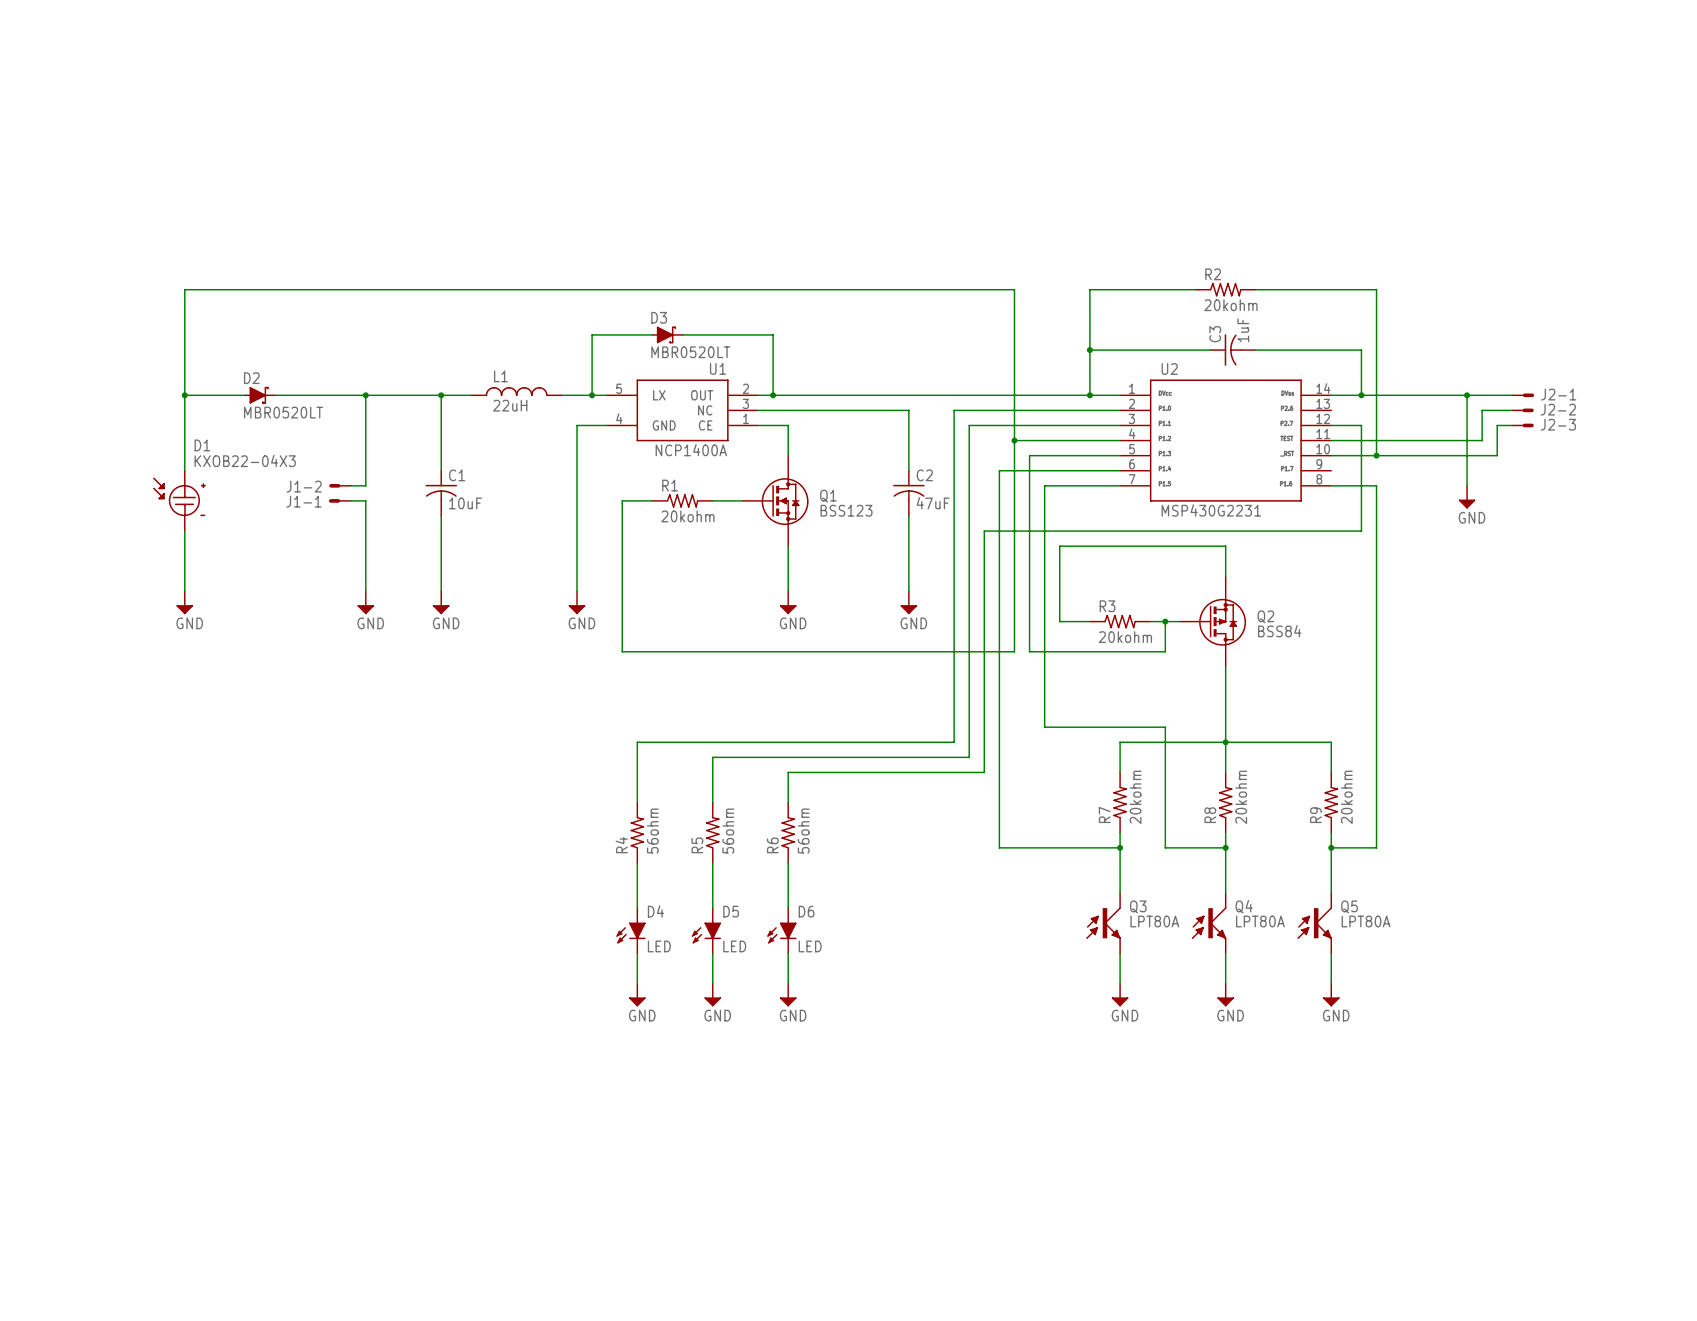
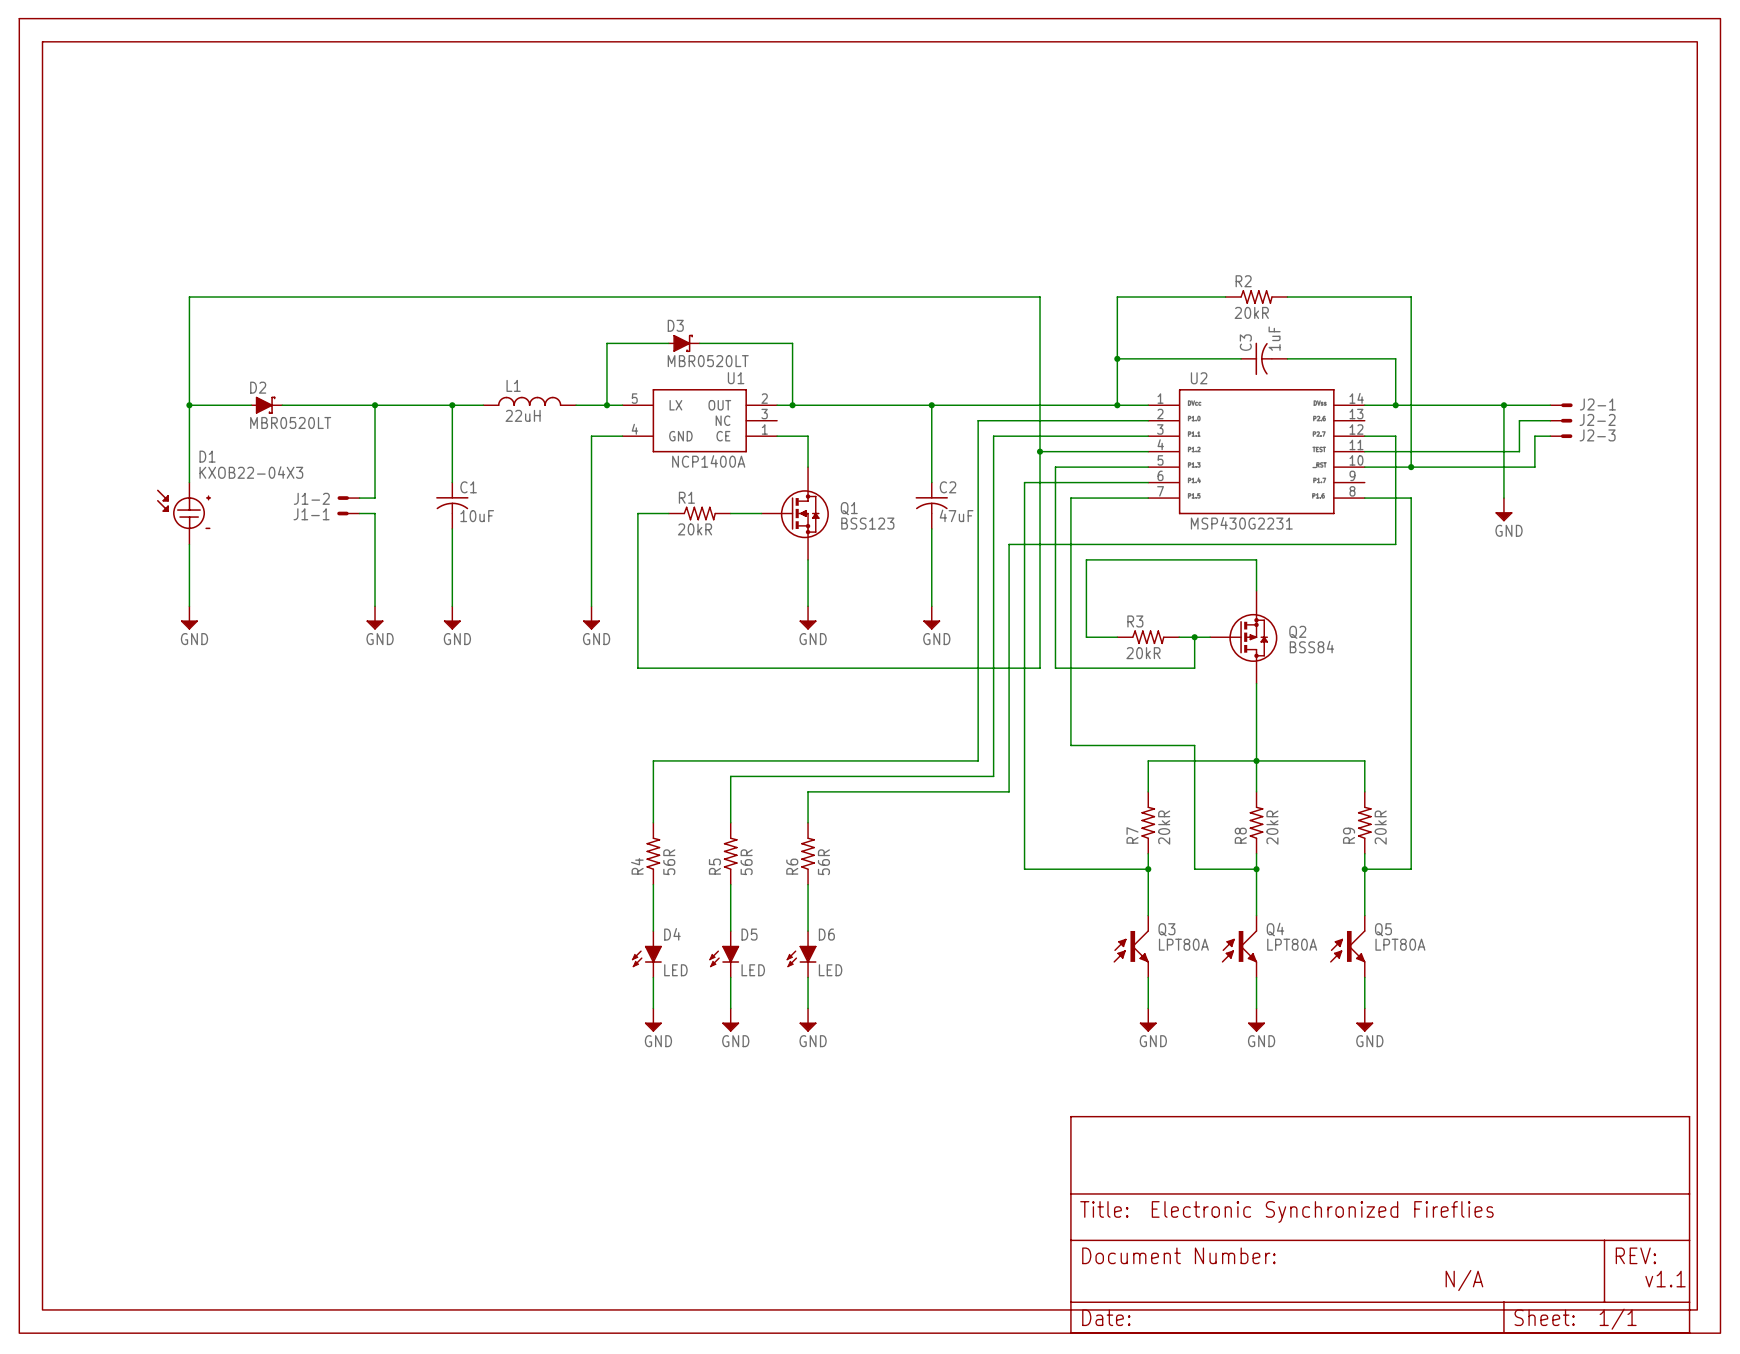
R2 value: 20kohm (1230, 305) -> 20kR (1251, 312)
junction: none -> (931, 405)
wire: (758, 410) (908, 410) -> (931, 405) (931, 420)
R1 value: 20kohm (687, 516) -> 20kR (695, 529)
R3 value: 20kohm (1125, 637) -> 20kR (1143, 653)
part: none -> (869, 675)
R7 value: 20kohm (1135, 797) -> 20kR (1164, 827)
R8 value: 20kohm (1241, 797) -> 20kR (1272, 827)
R9 value: 20kohm (1346, 797) -> 20kR (1380, 827)
R4 value: 56ohm (652, 831) -> 56R (669, 862)
R5 value: 56ohm (728, 831) -> 56R (746, 862)
R6 value: 56ohm (803, 831) -> 56R (823, 862)
part: none -> (1380, 1224)
text: none -> v1.1 (1665, 1279)
text: none -> N/A (1464, 1280)

